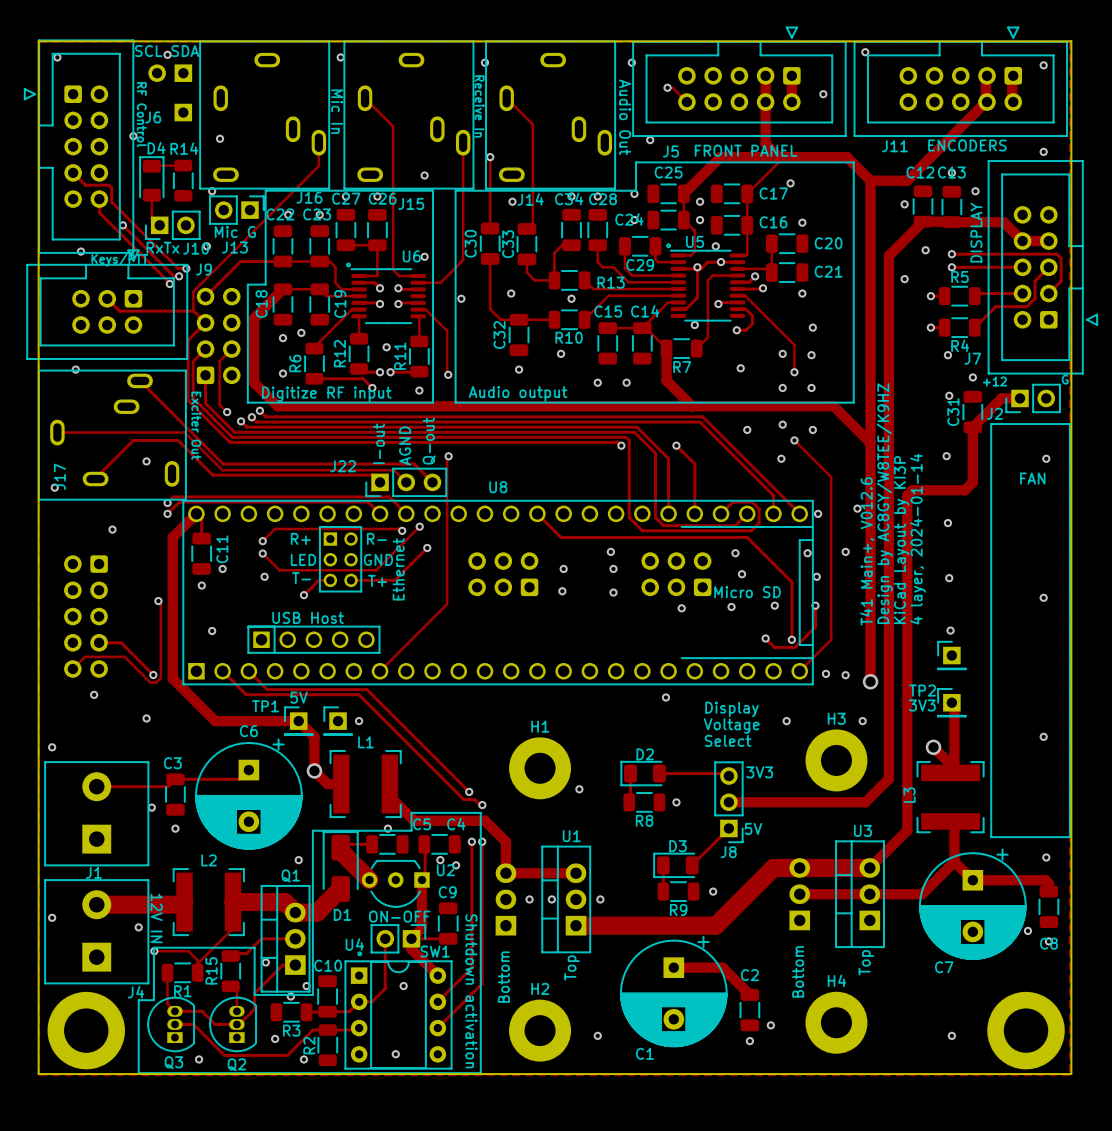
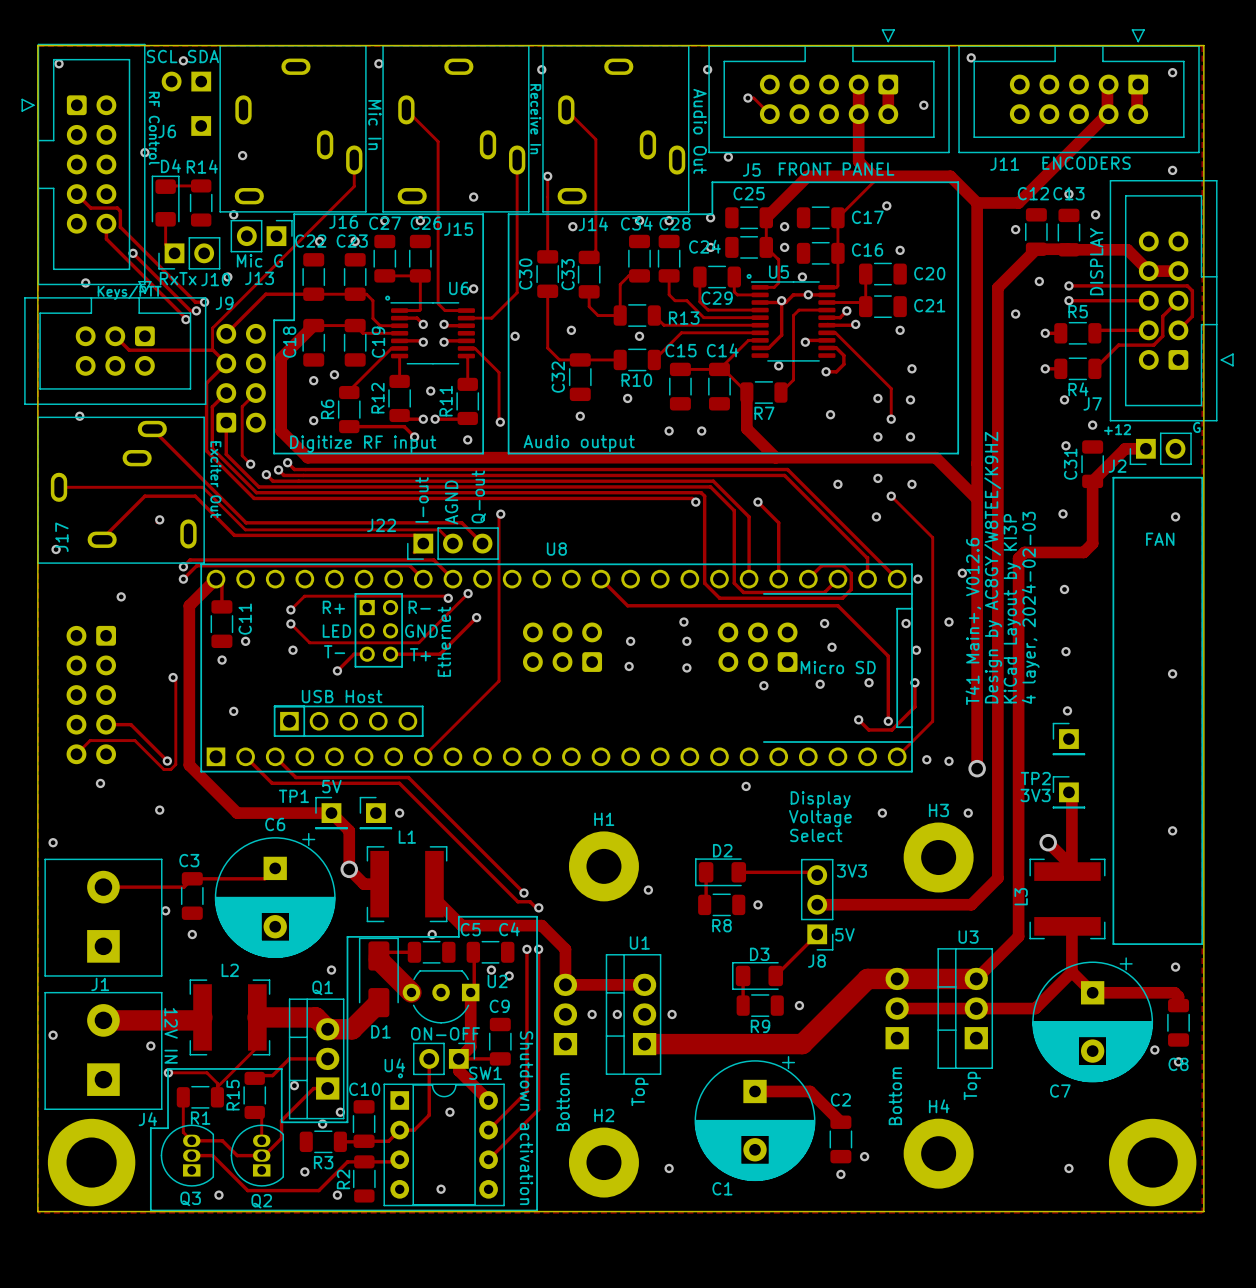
text: 4 layer, 2024-01-14 (918, 539) -> 4 layer, 2024-02-03 (1030, 607)

